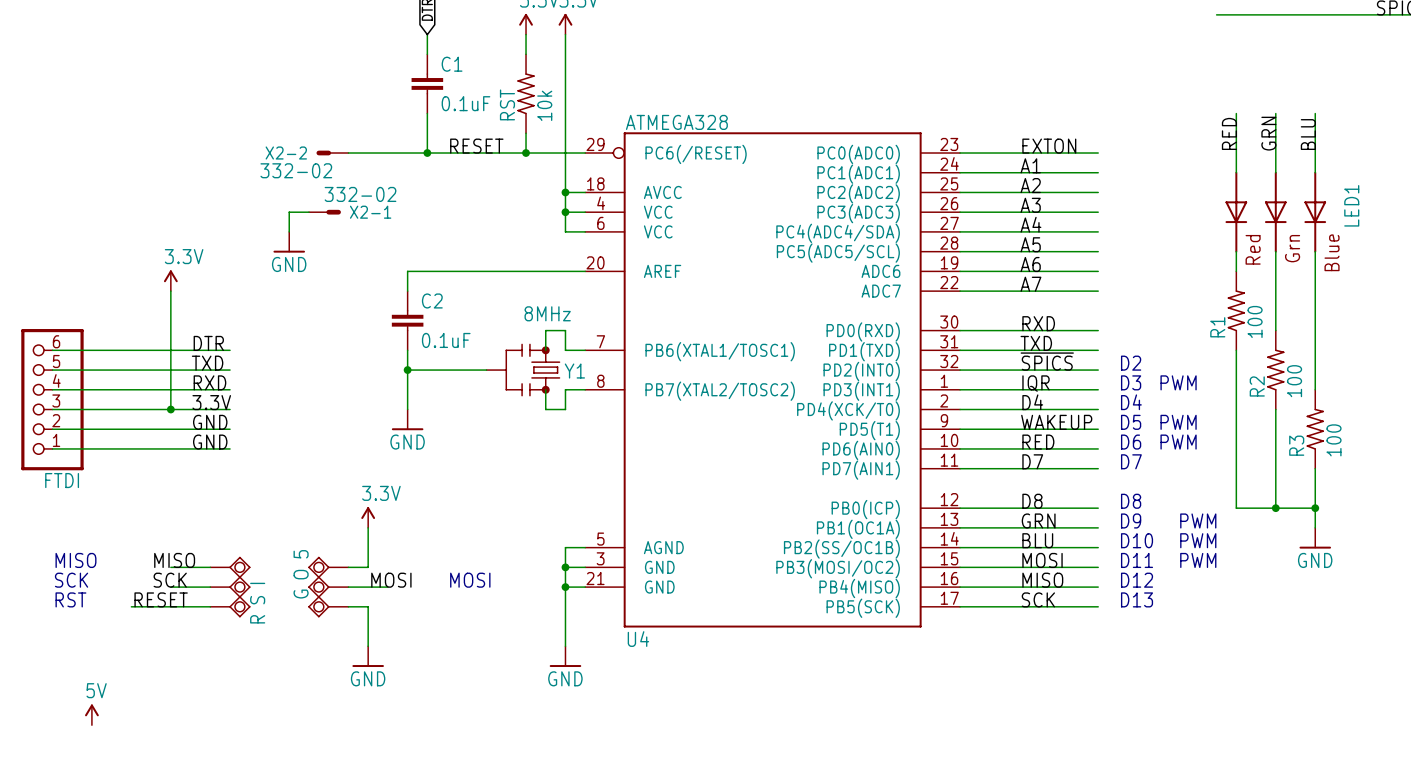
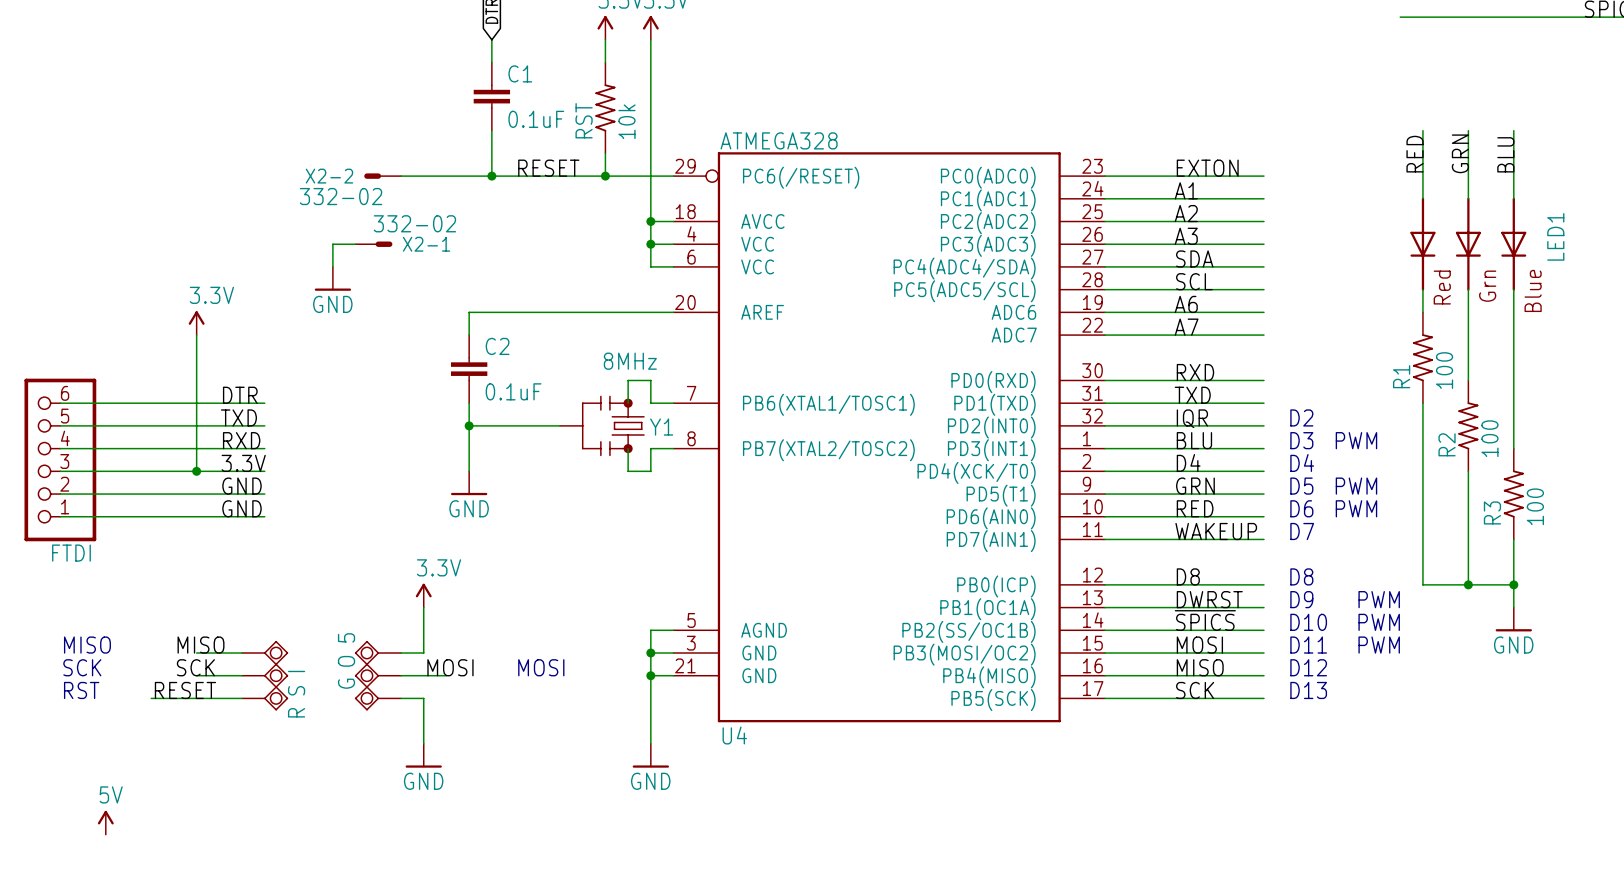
label: A4 (1030, 224) -> SDA (1194, 258)
label: A5 (1030, 244) -> SCL (1194, 281)
label: ~{SPICS} (1047, 361) -> IQR (1192, 418)
label: IQR (1036, 383) -> BLU (1194, 440)
label: WAKEUP (1056, 422) -> GRN (1195, 486)
label: D7 (1032, 461) -> WAKEUP (1216, 531)
label: GRN (1038, 520) -> DWRST (1209, 599)
label: BLU (1037, 540) -> ~{SPICS} (1205, 620)

